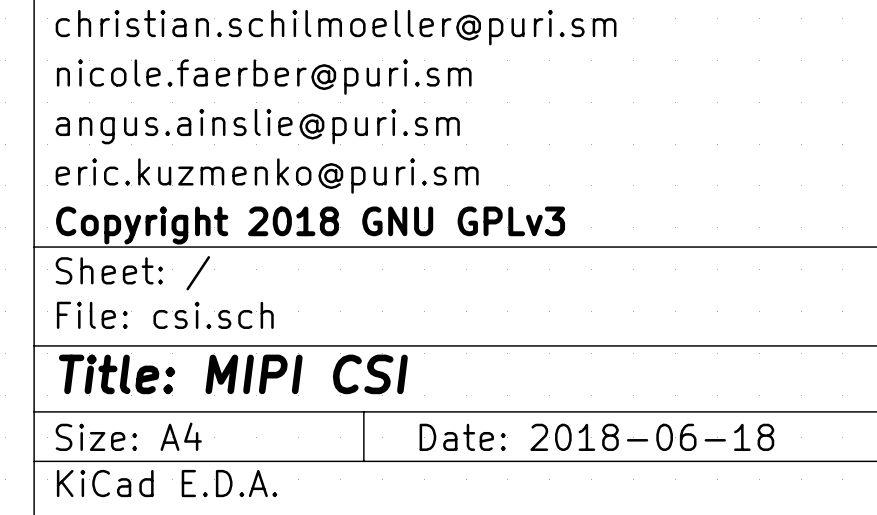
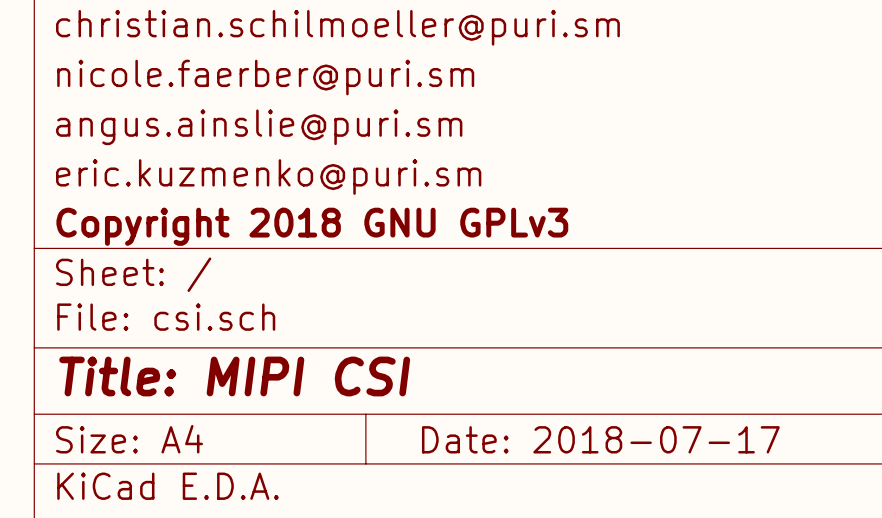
title block: Date: 2018-06-18 (596, 437) -> Date: 2018-07-17 (600, 439)

